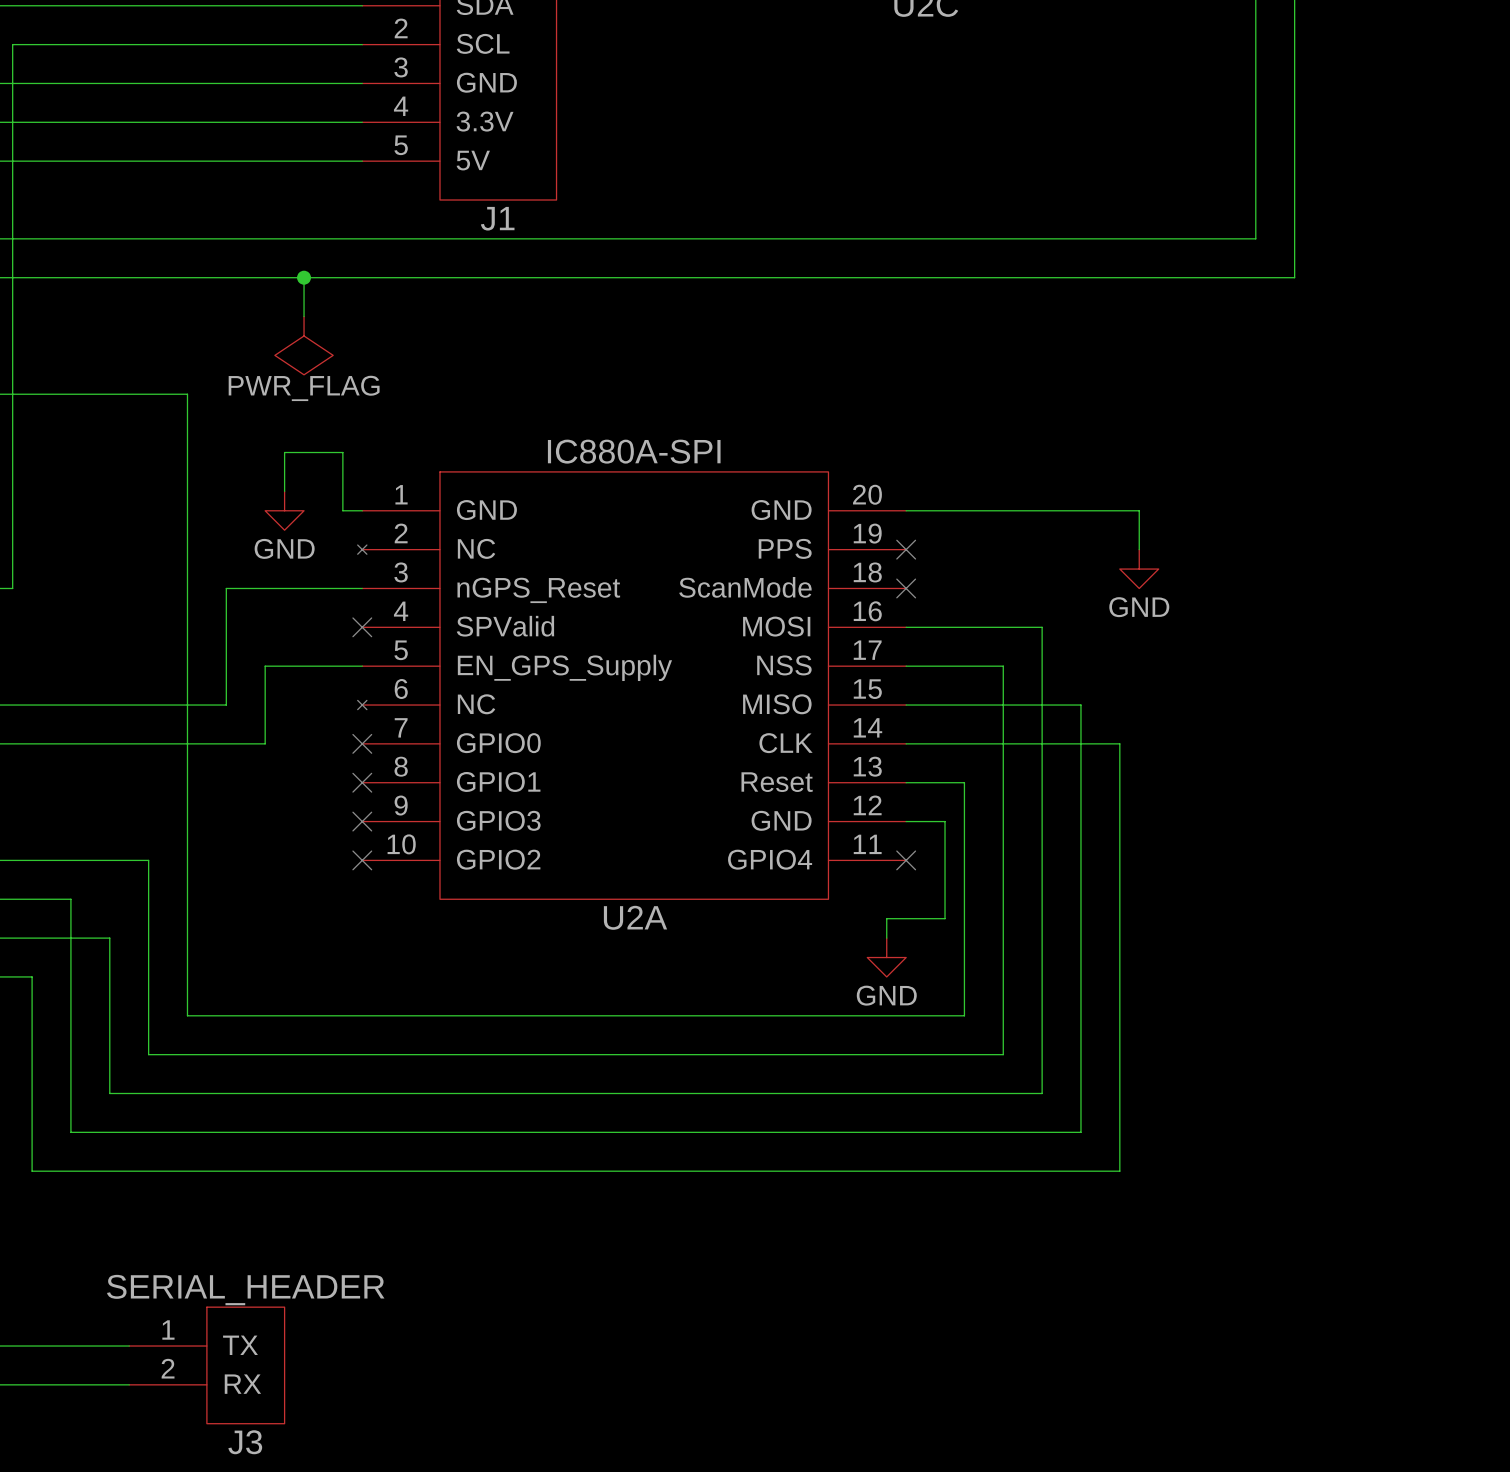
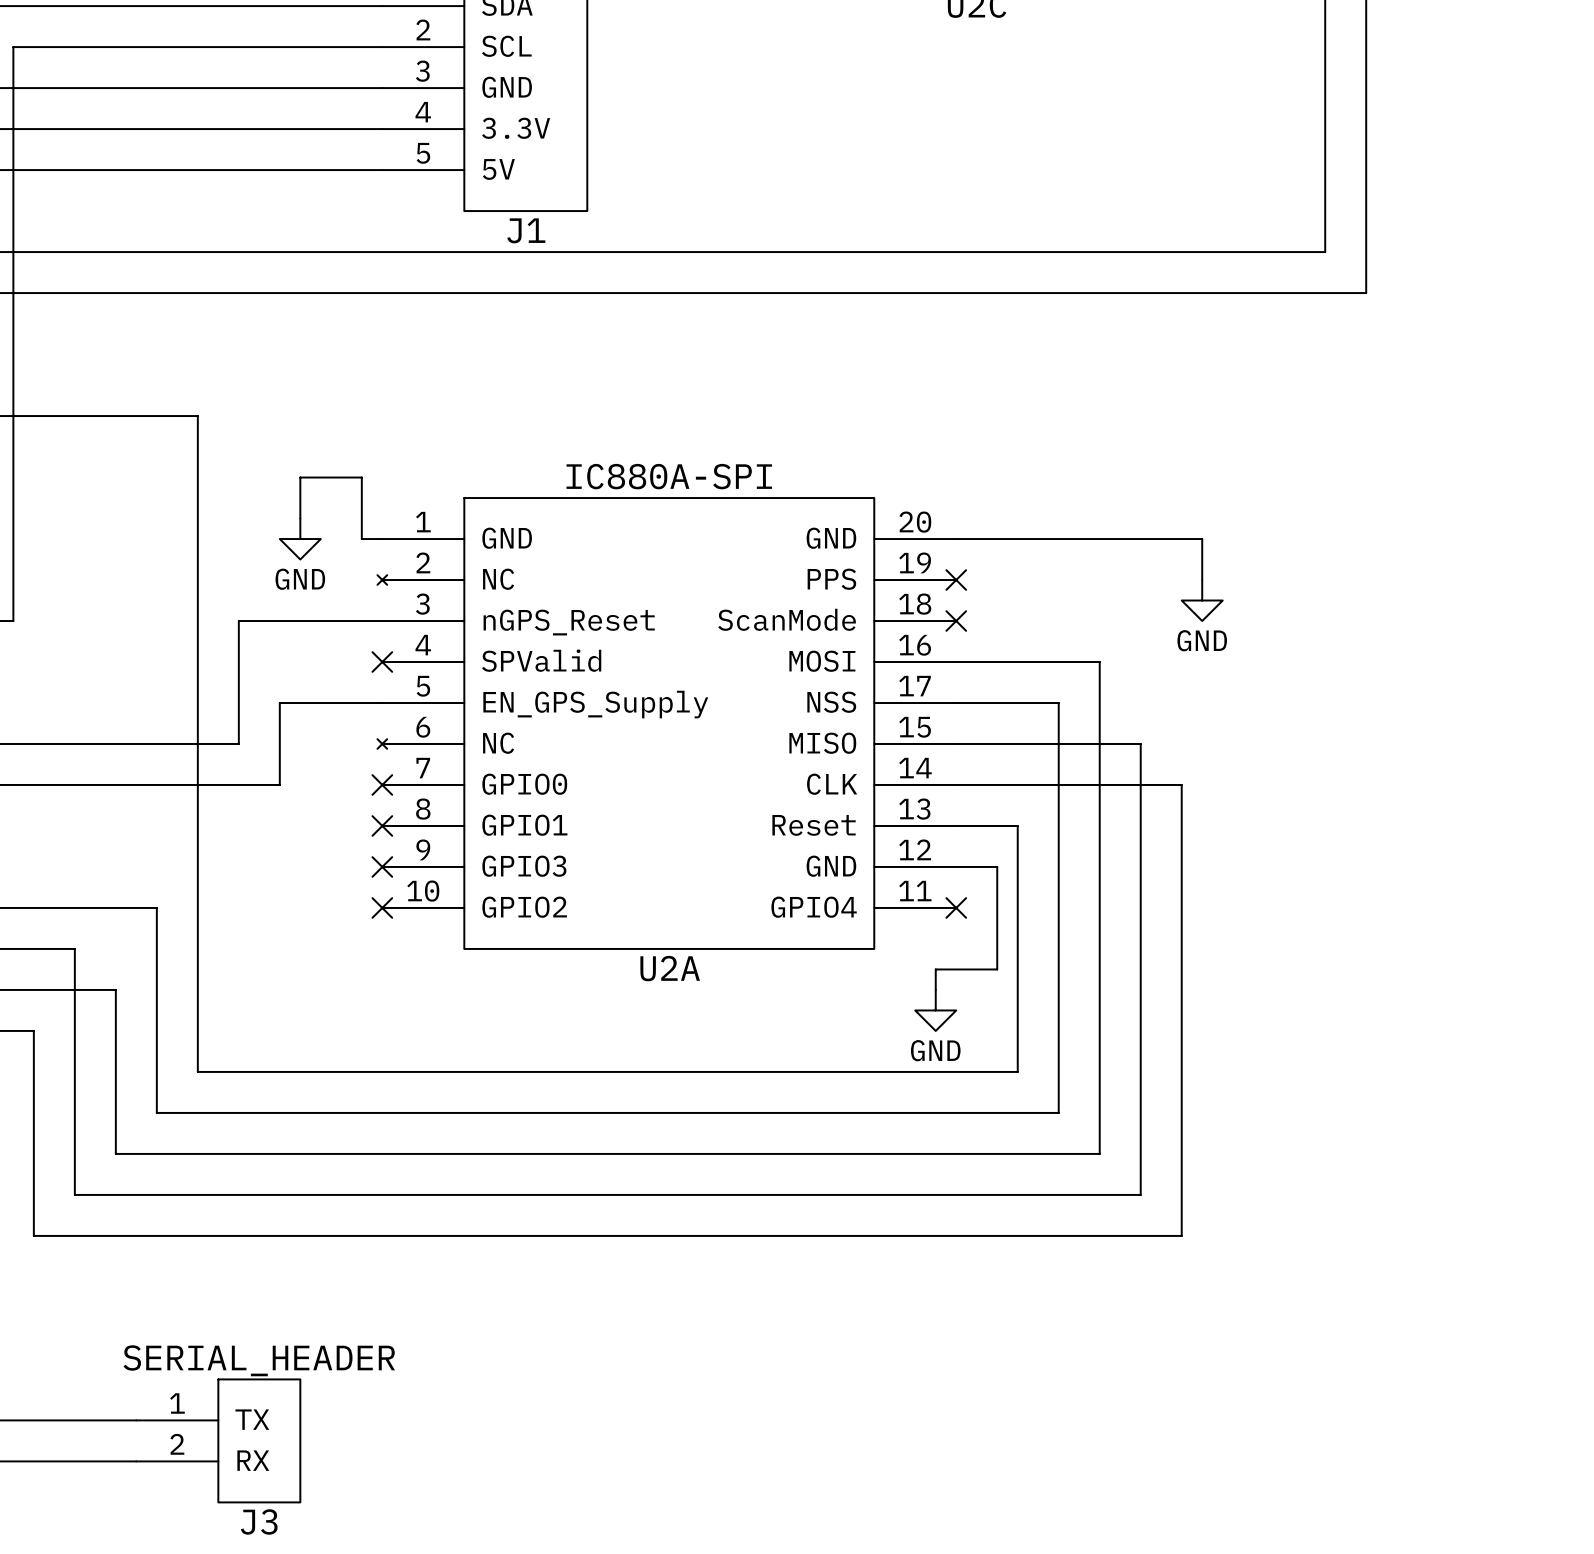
wire: (304, 277) (304, 316) -> none
junction: (304, 277) -> none
power symbol: PWR_FLAG (304, 345) -> none

